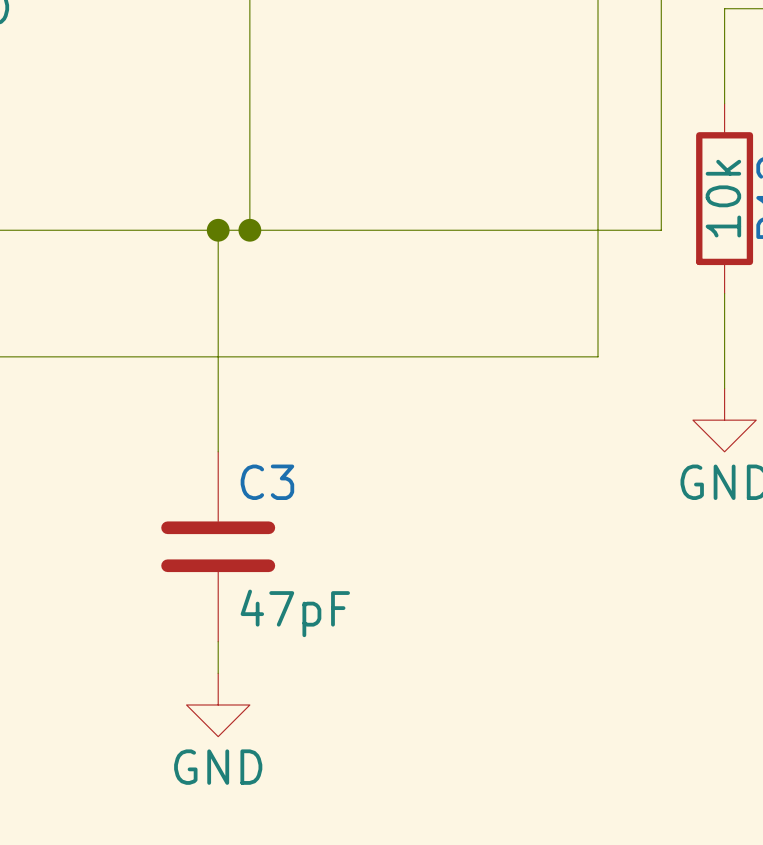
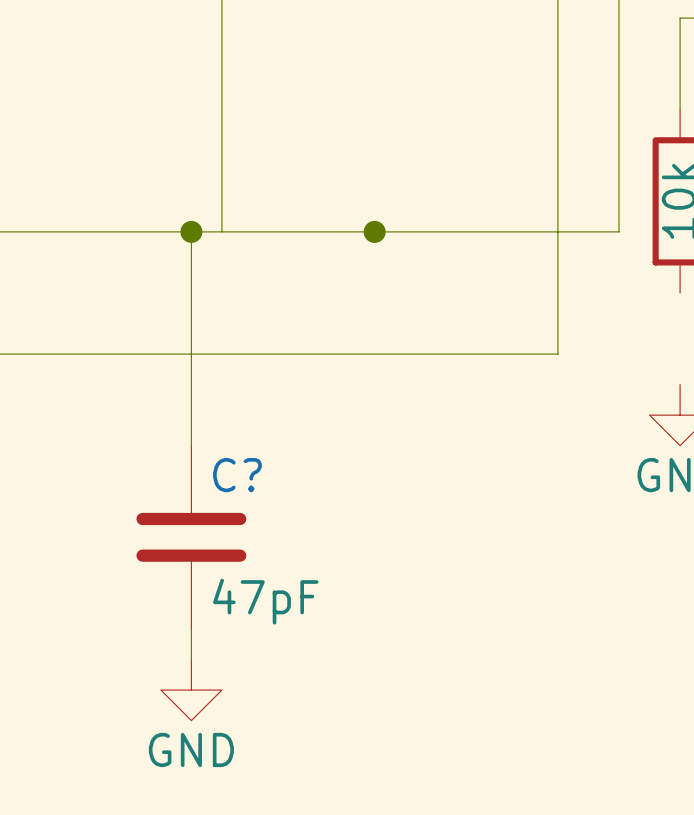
junction: (249, 230) -> none
junction: none -> (374, 231)
wire: (724, 293) (724, 388) -> none
C3 name: C3 (267, 482) -> C? (237, 475)

